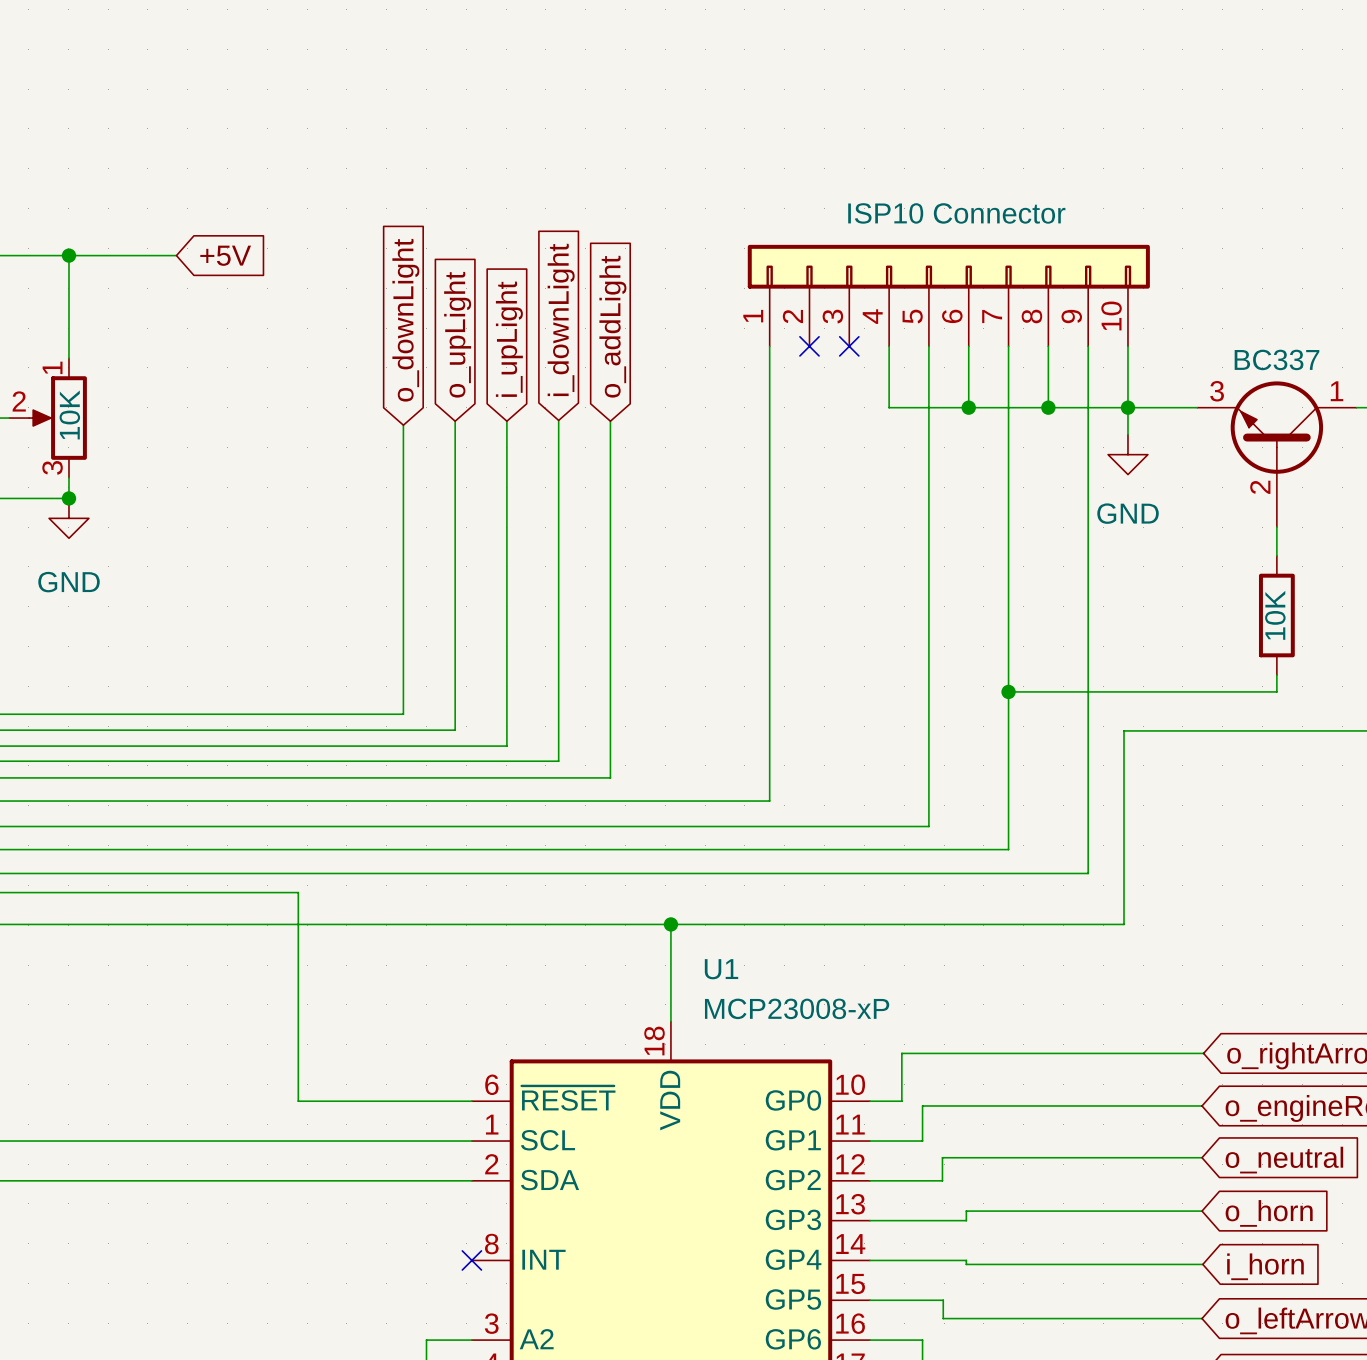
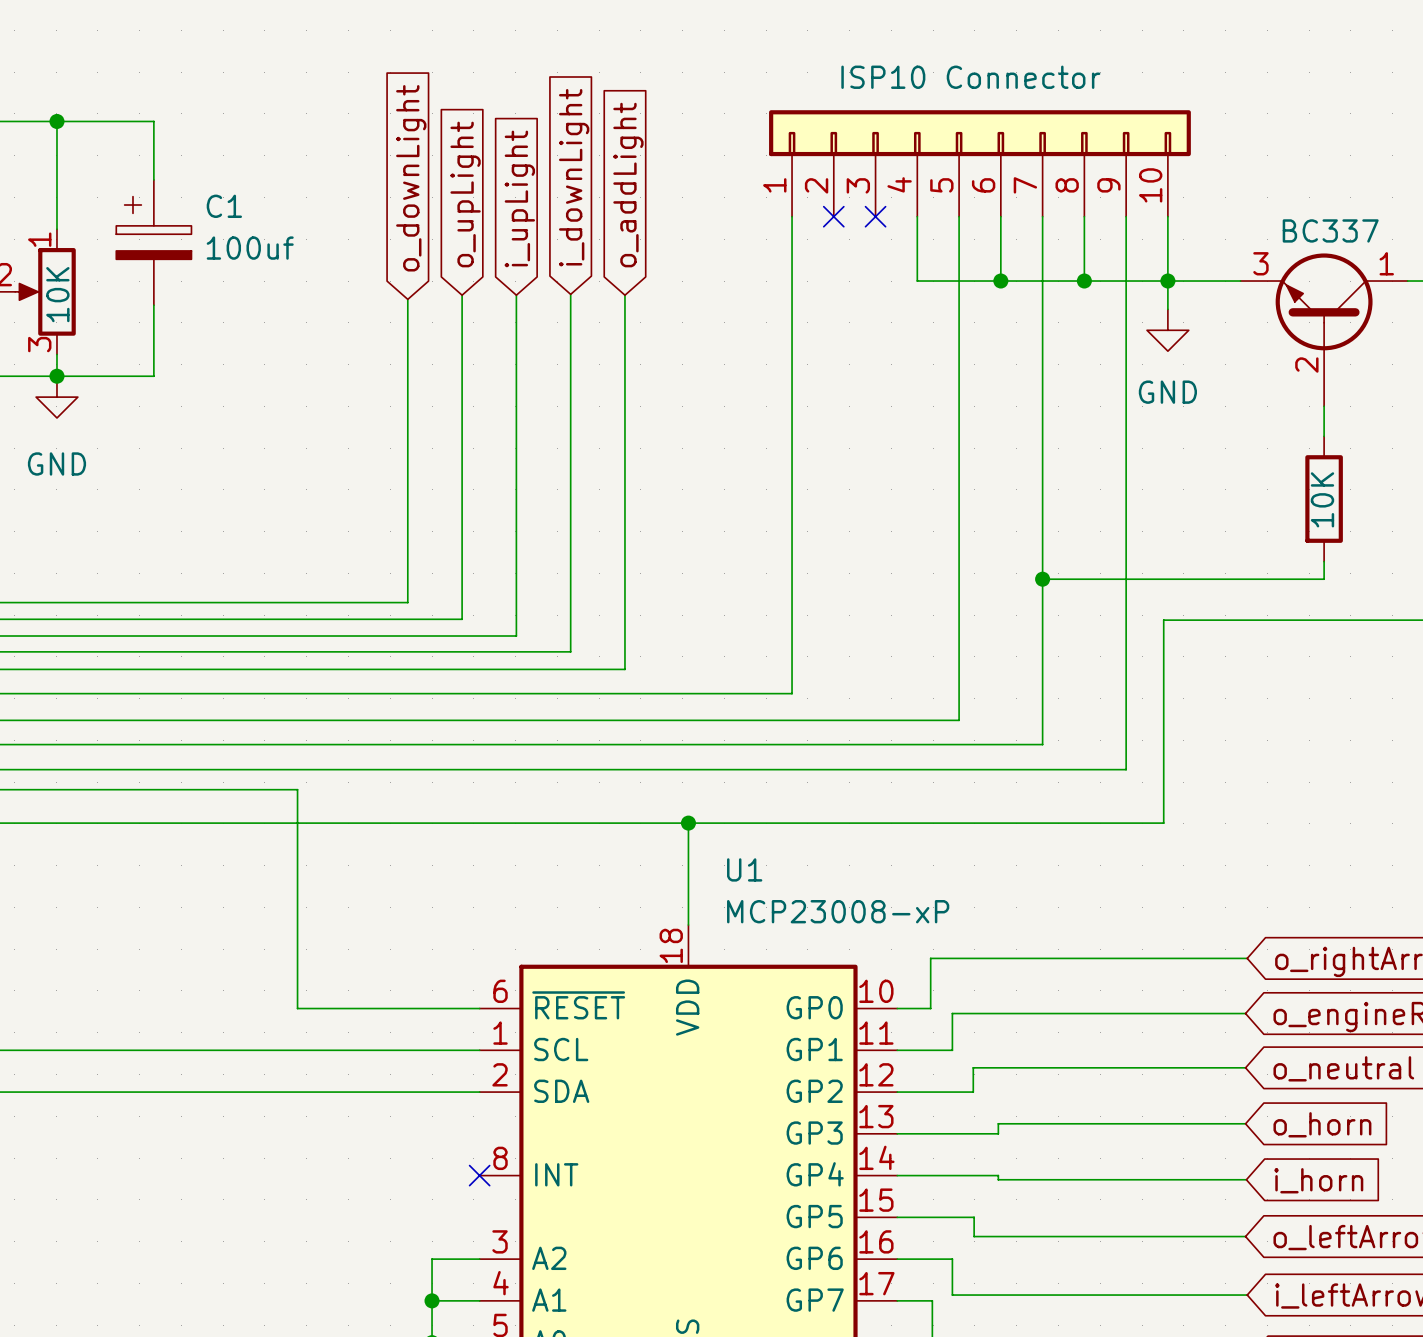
wire: (161, 255) (176, 255) -> (153, 121) (153, 179)
global label: +5V (225, 255) -> none
C1: none -> 100uf (153, 242)
wire: none -> (153, 305) (153, 376) (56, 376)

